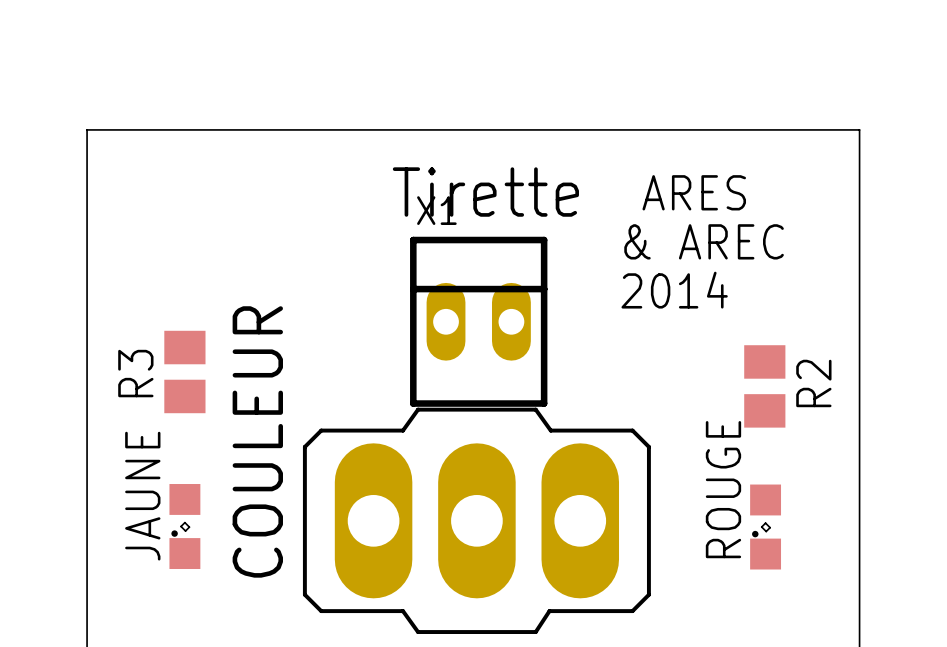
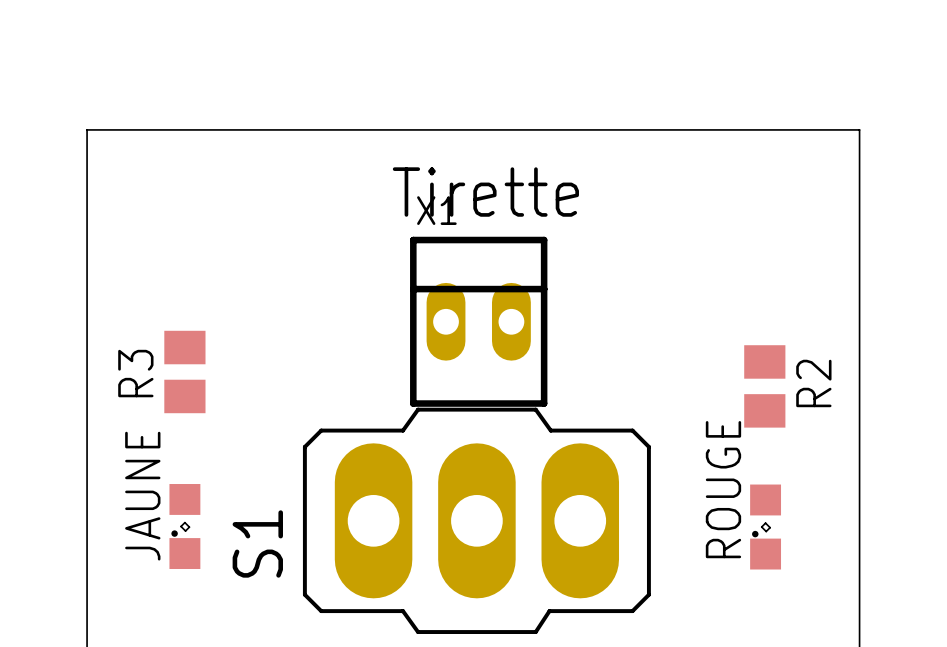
text: ARES (694, 192) -> none
text: & AREC (704, 241) -> none
text: 2014 (674, 290) -> none
COULEUR name: COULEUR (257, 441) -> S1 (257, 543)

